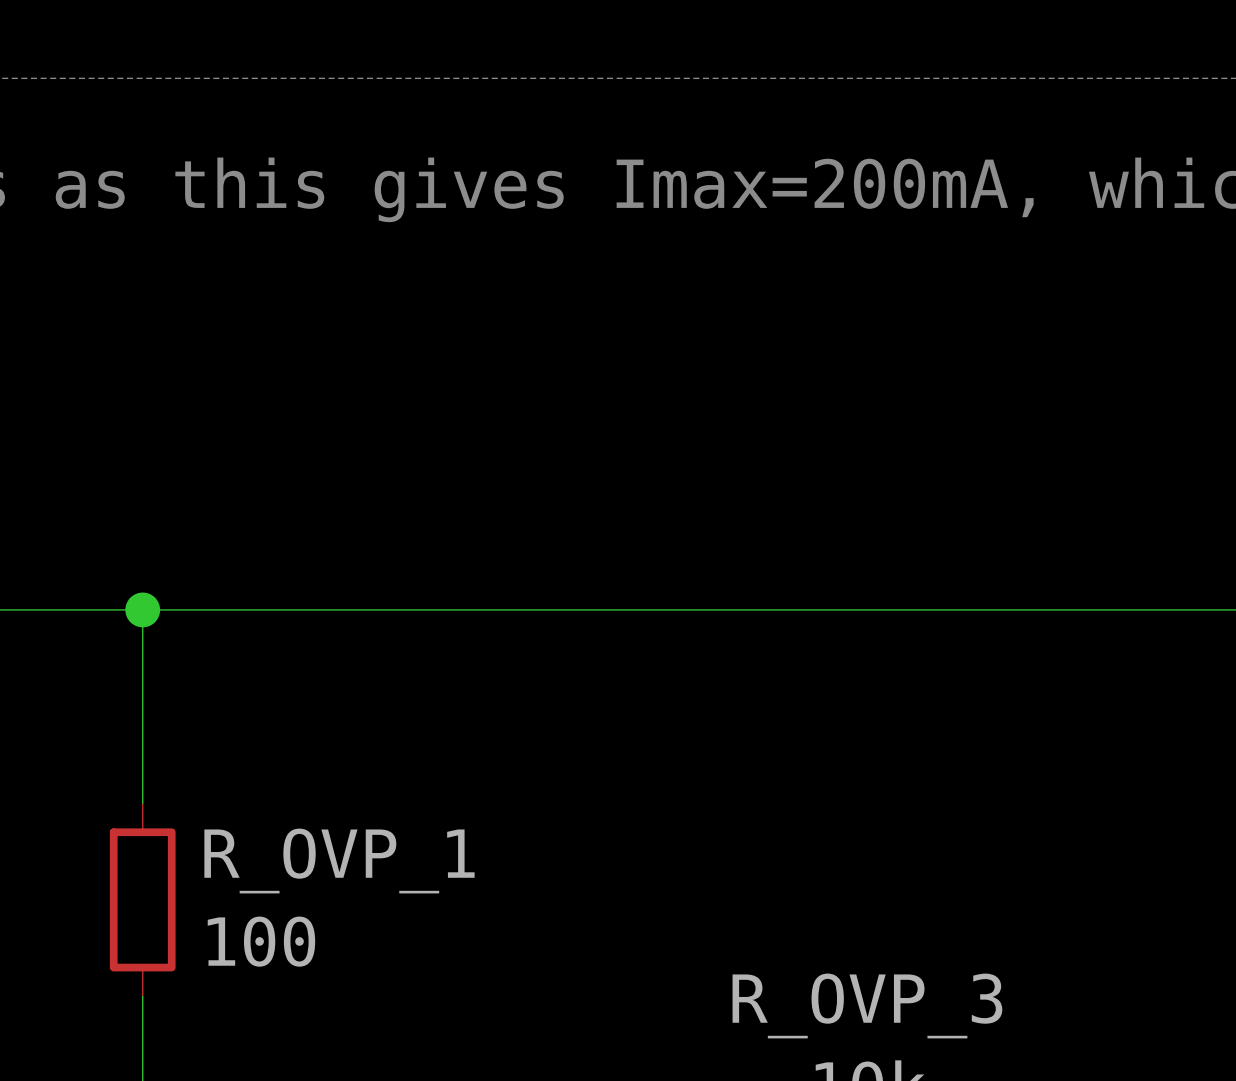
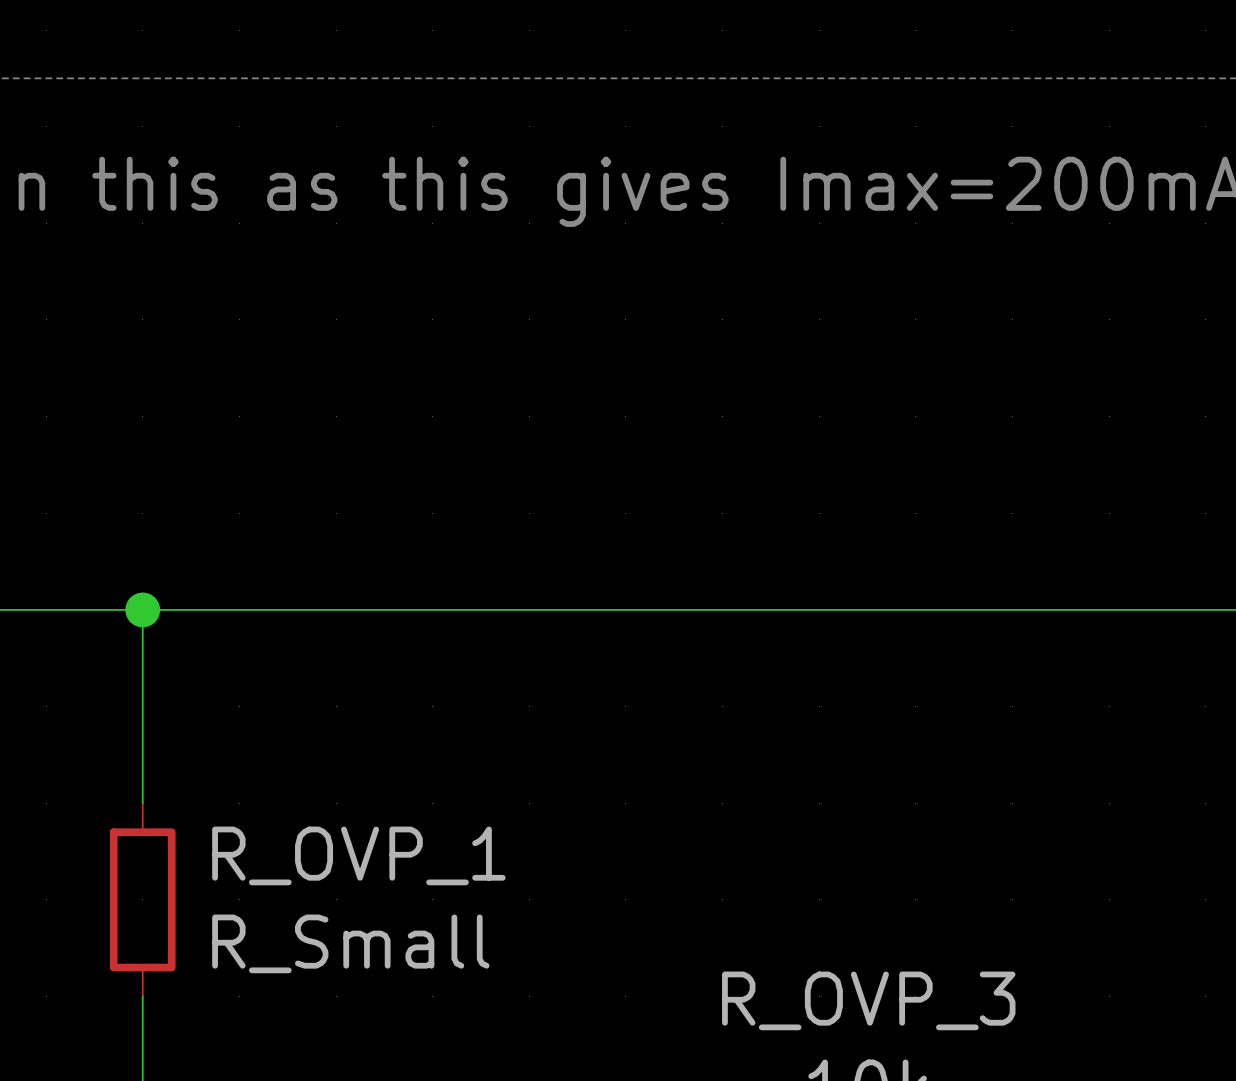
R_OVP_1 value: 100 (261, 941) -> R_Small (350, 943)

